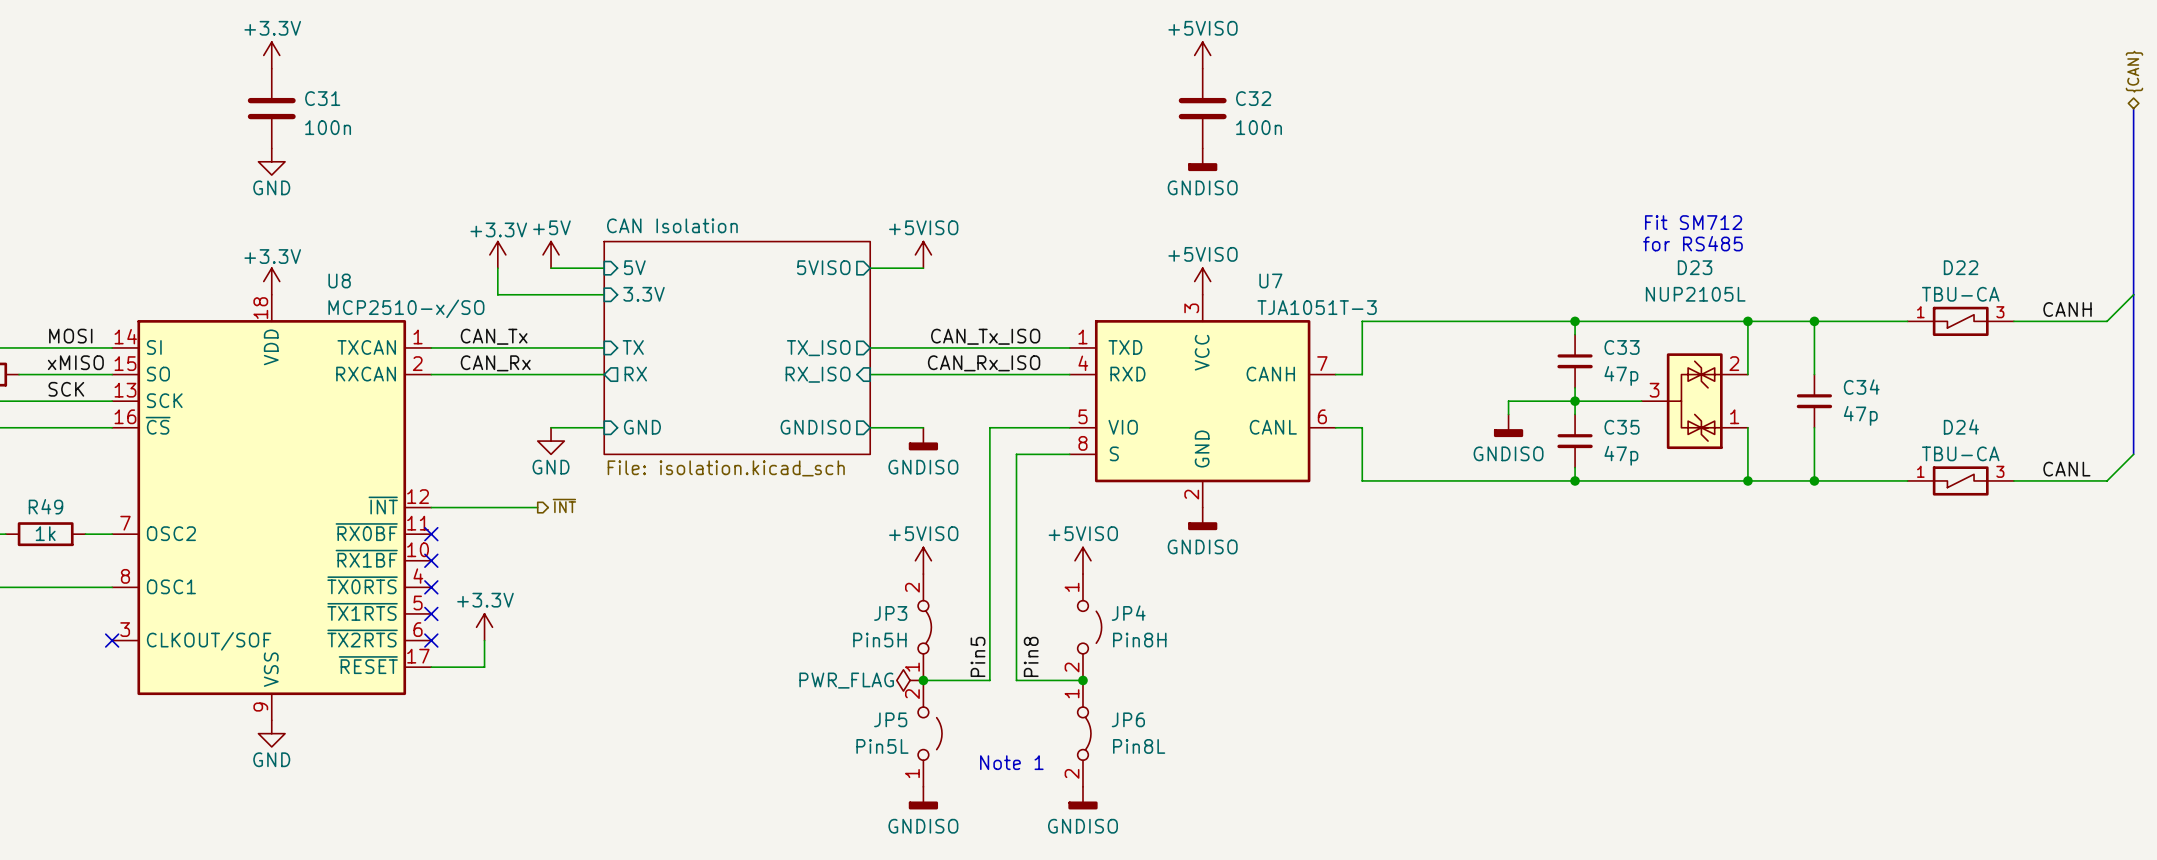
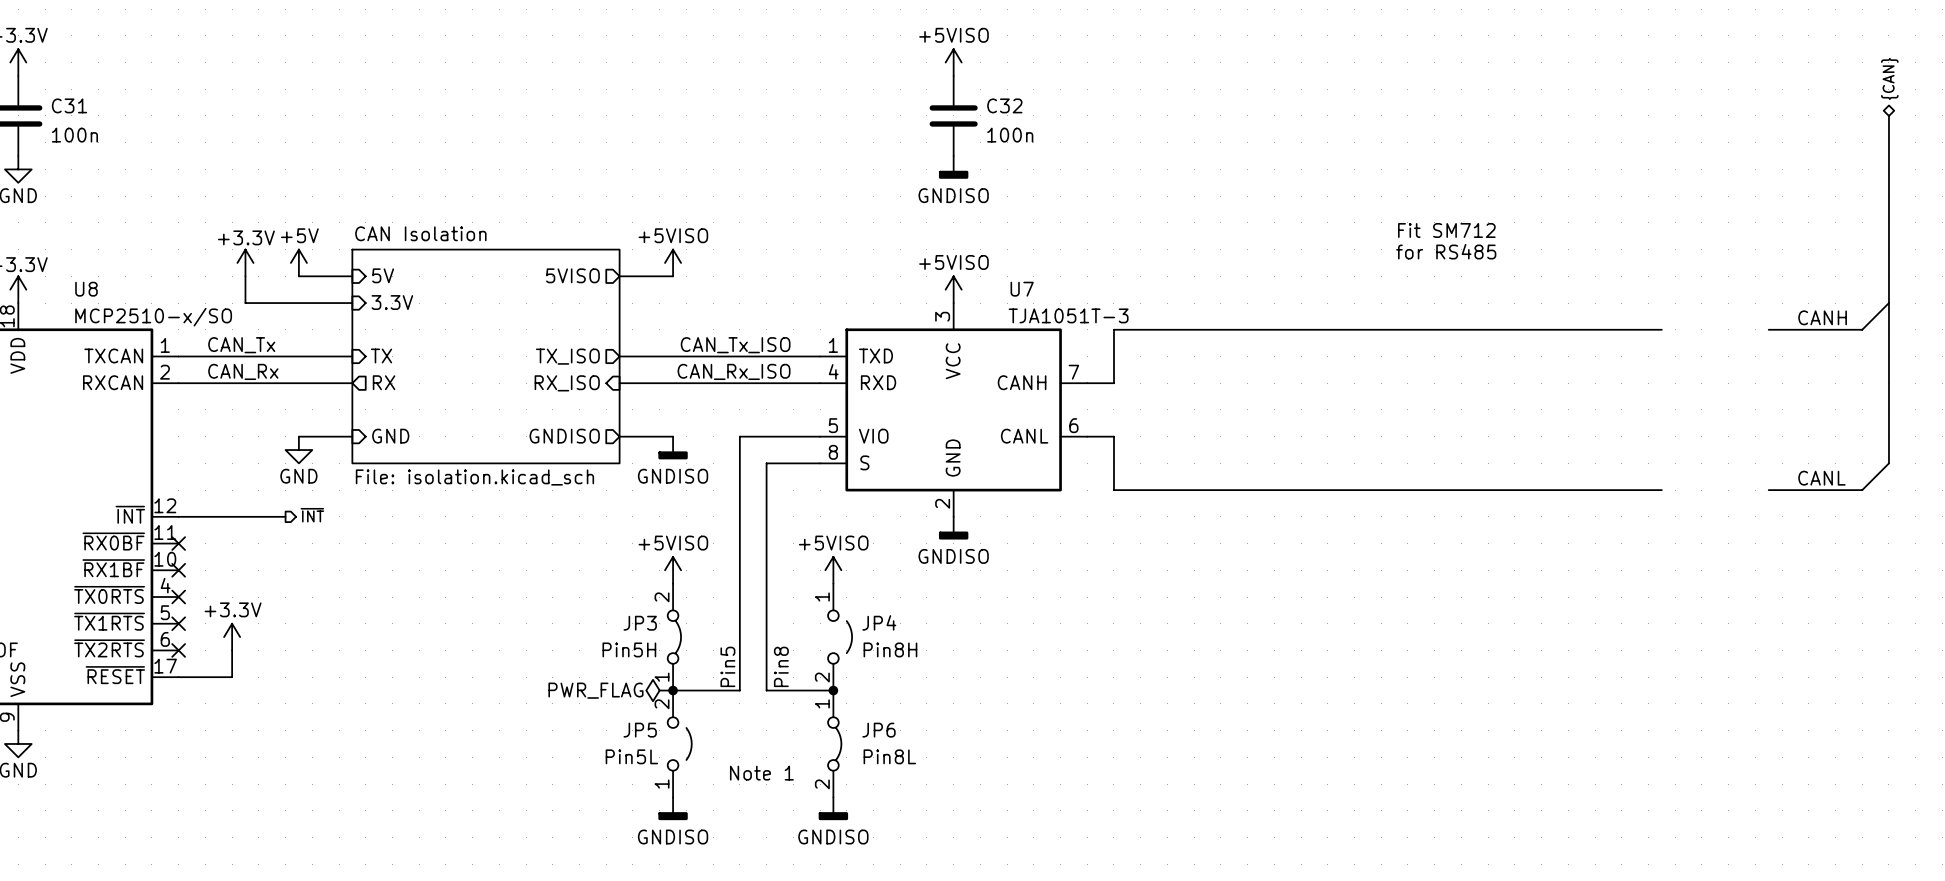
wire: (1575, 321) (1575, 334) -> none
junction: (1575, 321) -> none
wire: (1747, 321) (1747, 374) -> none
junction: (1747, 321) -> none
wire: (1814, 321) (1814, 374) -> none
junction: (1814, 321) -> none
D22: TBU-CA (1960, 321) -> none
C33: 47p (1575, 361) -> none
wire: (1575, 387) (1575, 414) -> none
junction: (1575, 401) -> none
wire: (1641, 401) (1508, 401) (1508, 414) -> none
D23: NUP2105L (1694, 401) -> none
C34: 47p (1814, 401) -> none
power symbol: GNDISO (1508, 425) -> none
wire: (1747, 427) (1747, 480) -> none
wire: (1814, 427) (1814, 480) -> none
C35: 47p (1575, 441) -> none
wire: (1575, 467) (1575, 480) -> none
junction: (1575, 480) -> none
junction: (1747, 480) -> none
junction: (1814, 480) -> none
D24: TBU-CA (1960, 480) -> none

